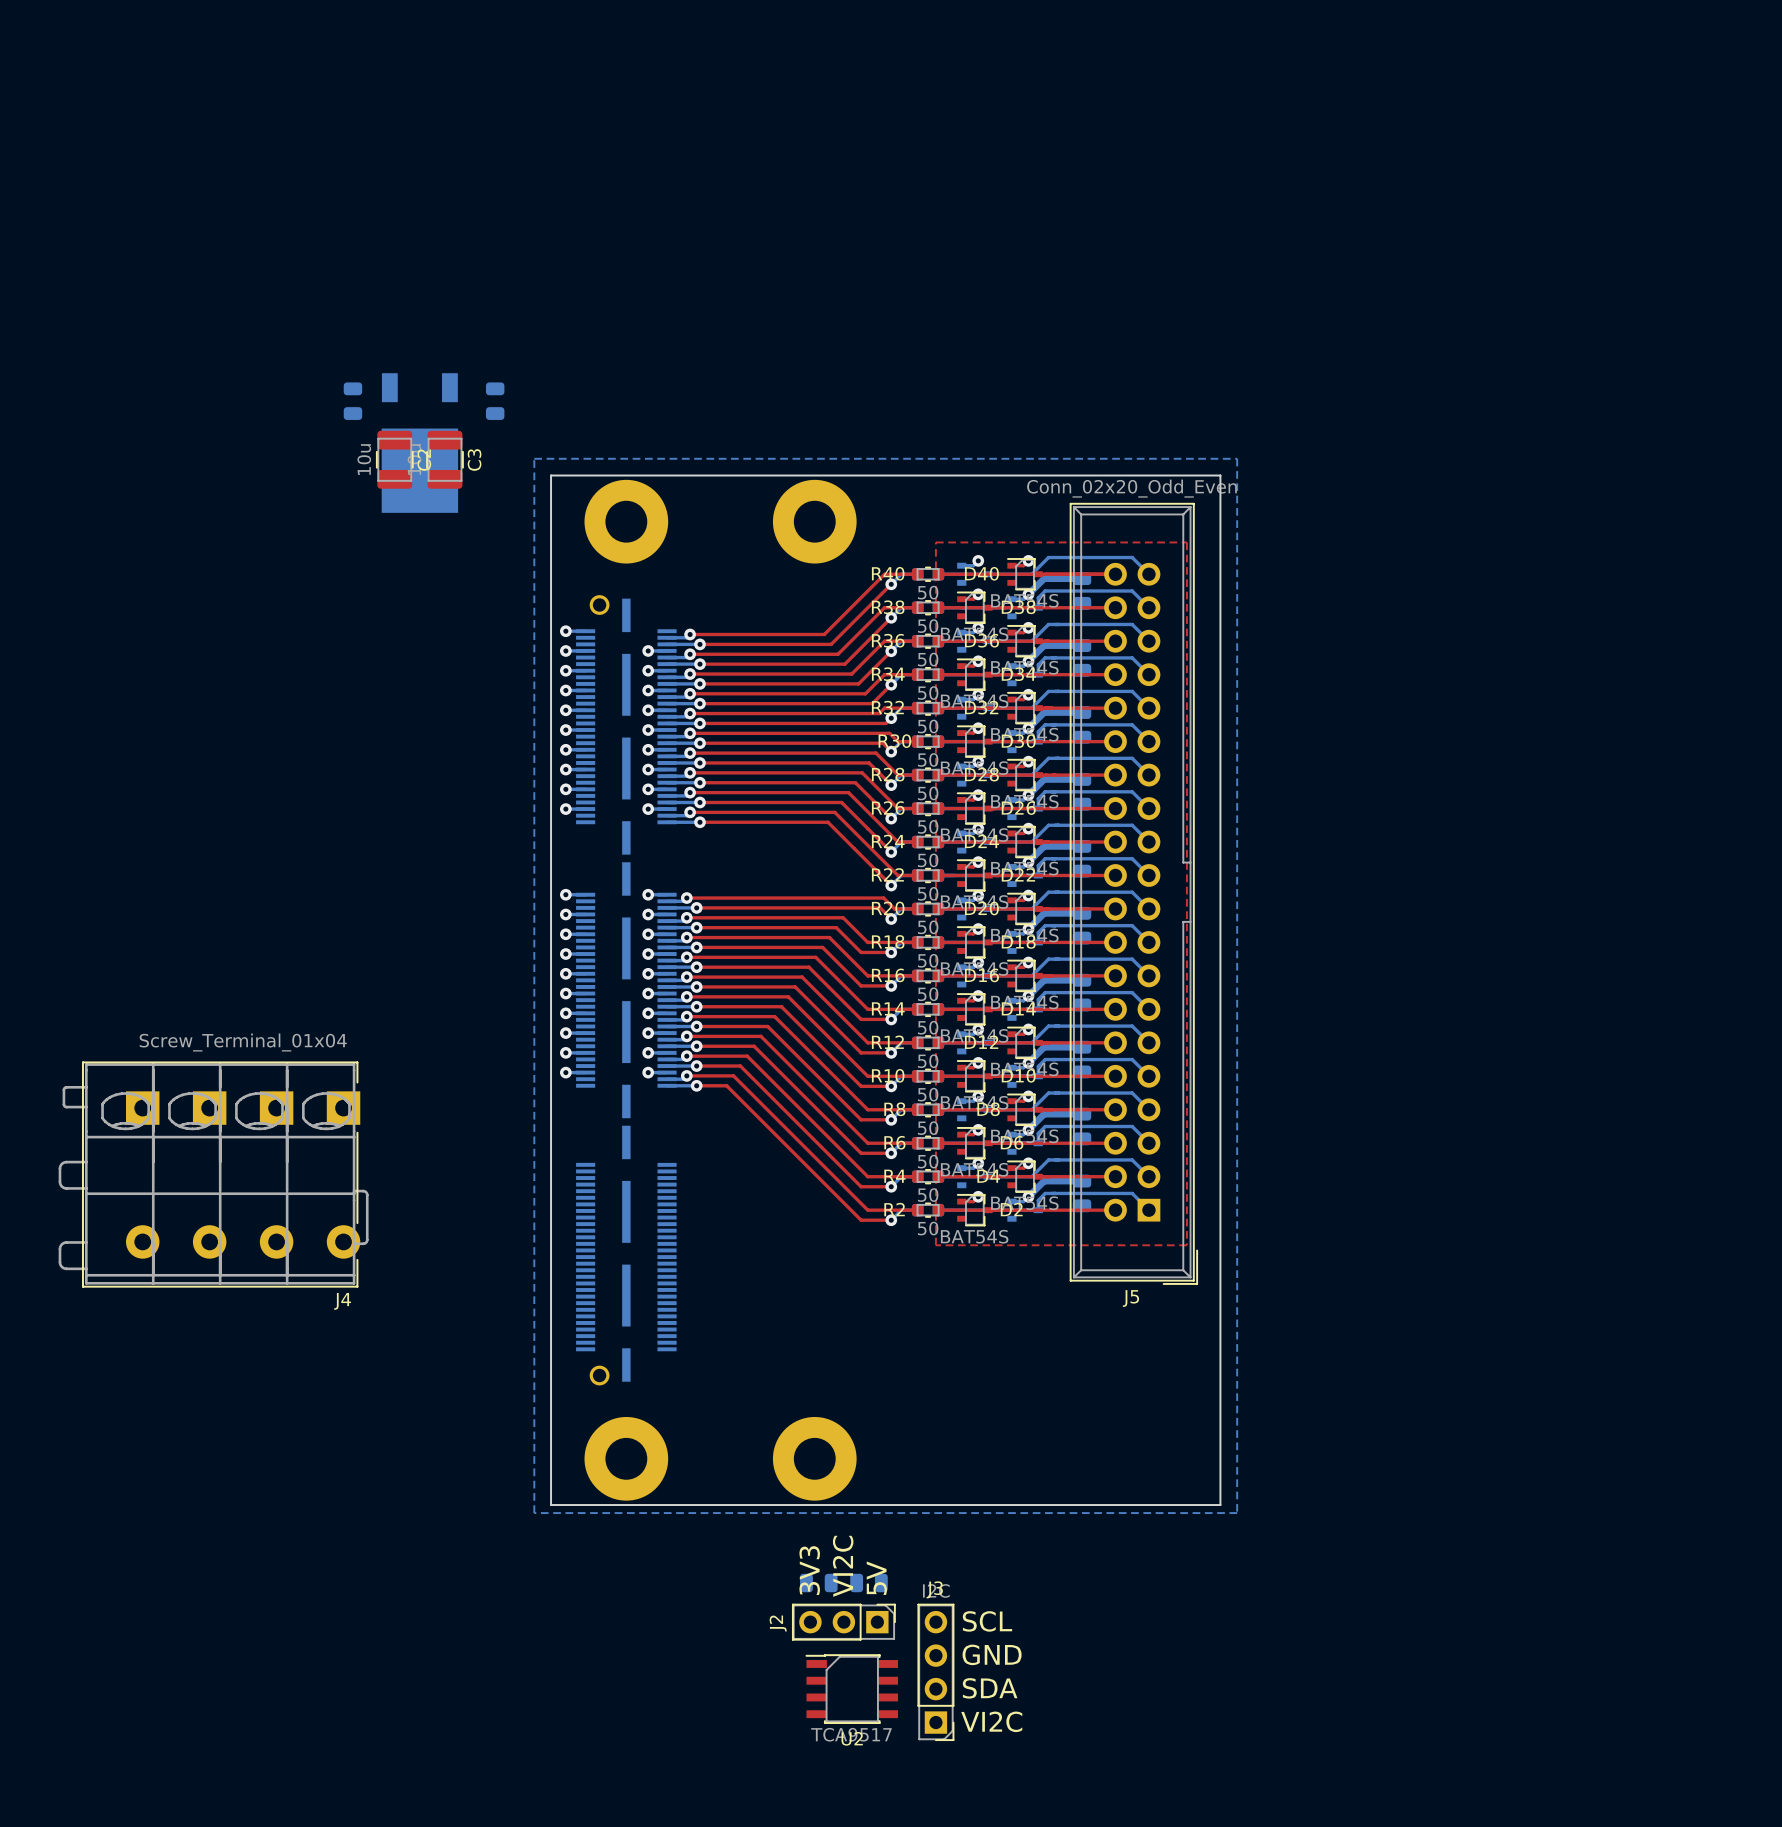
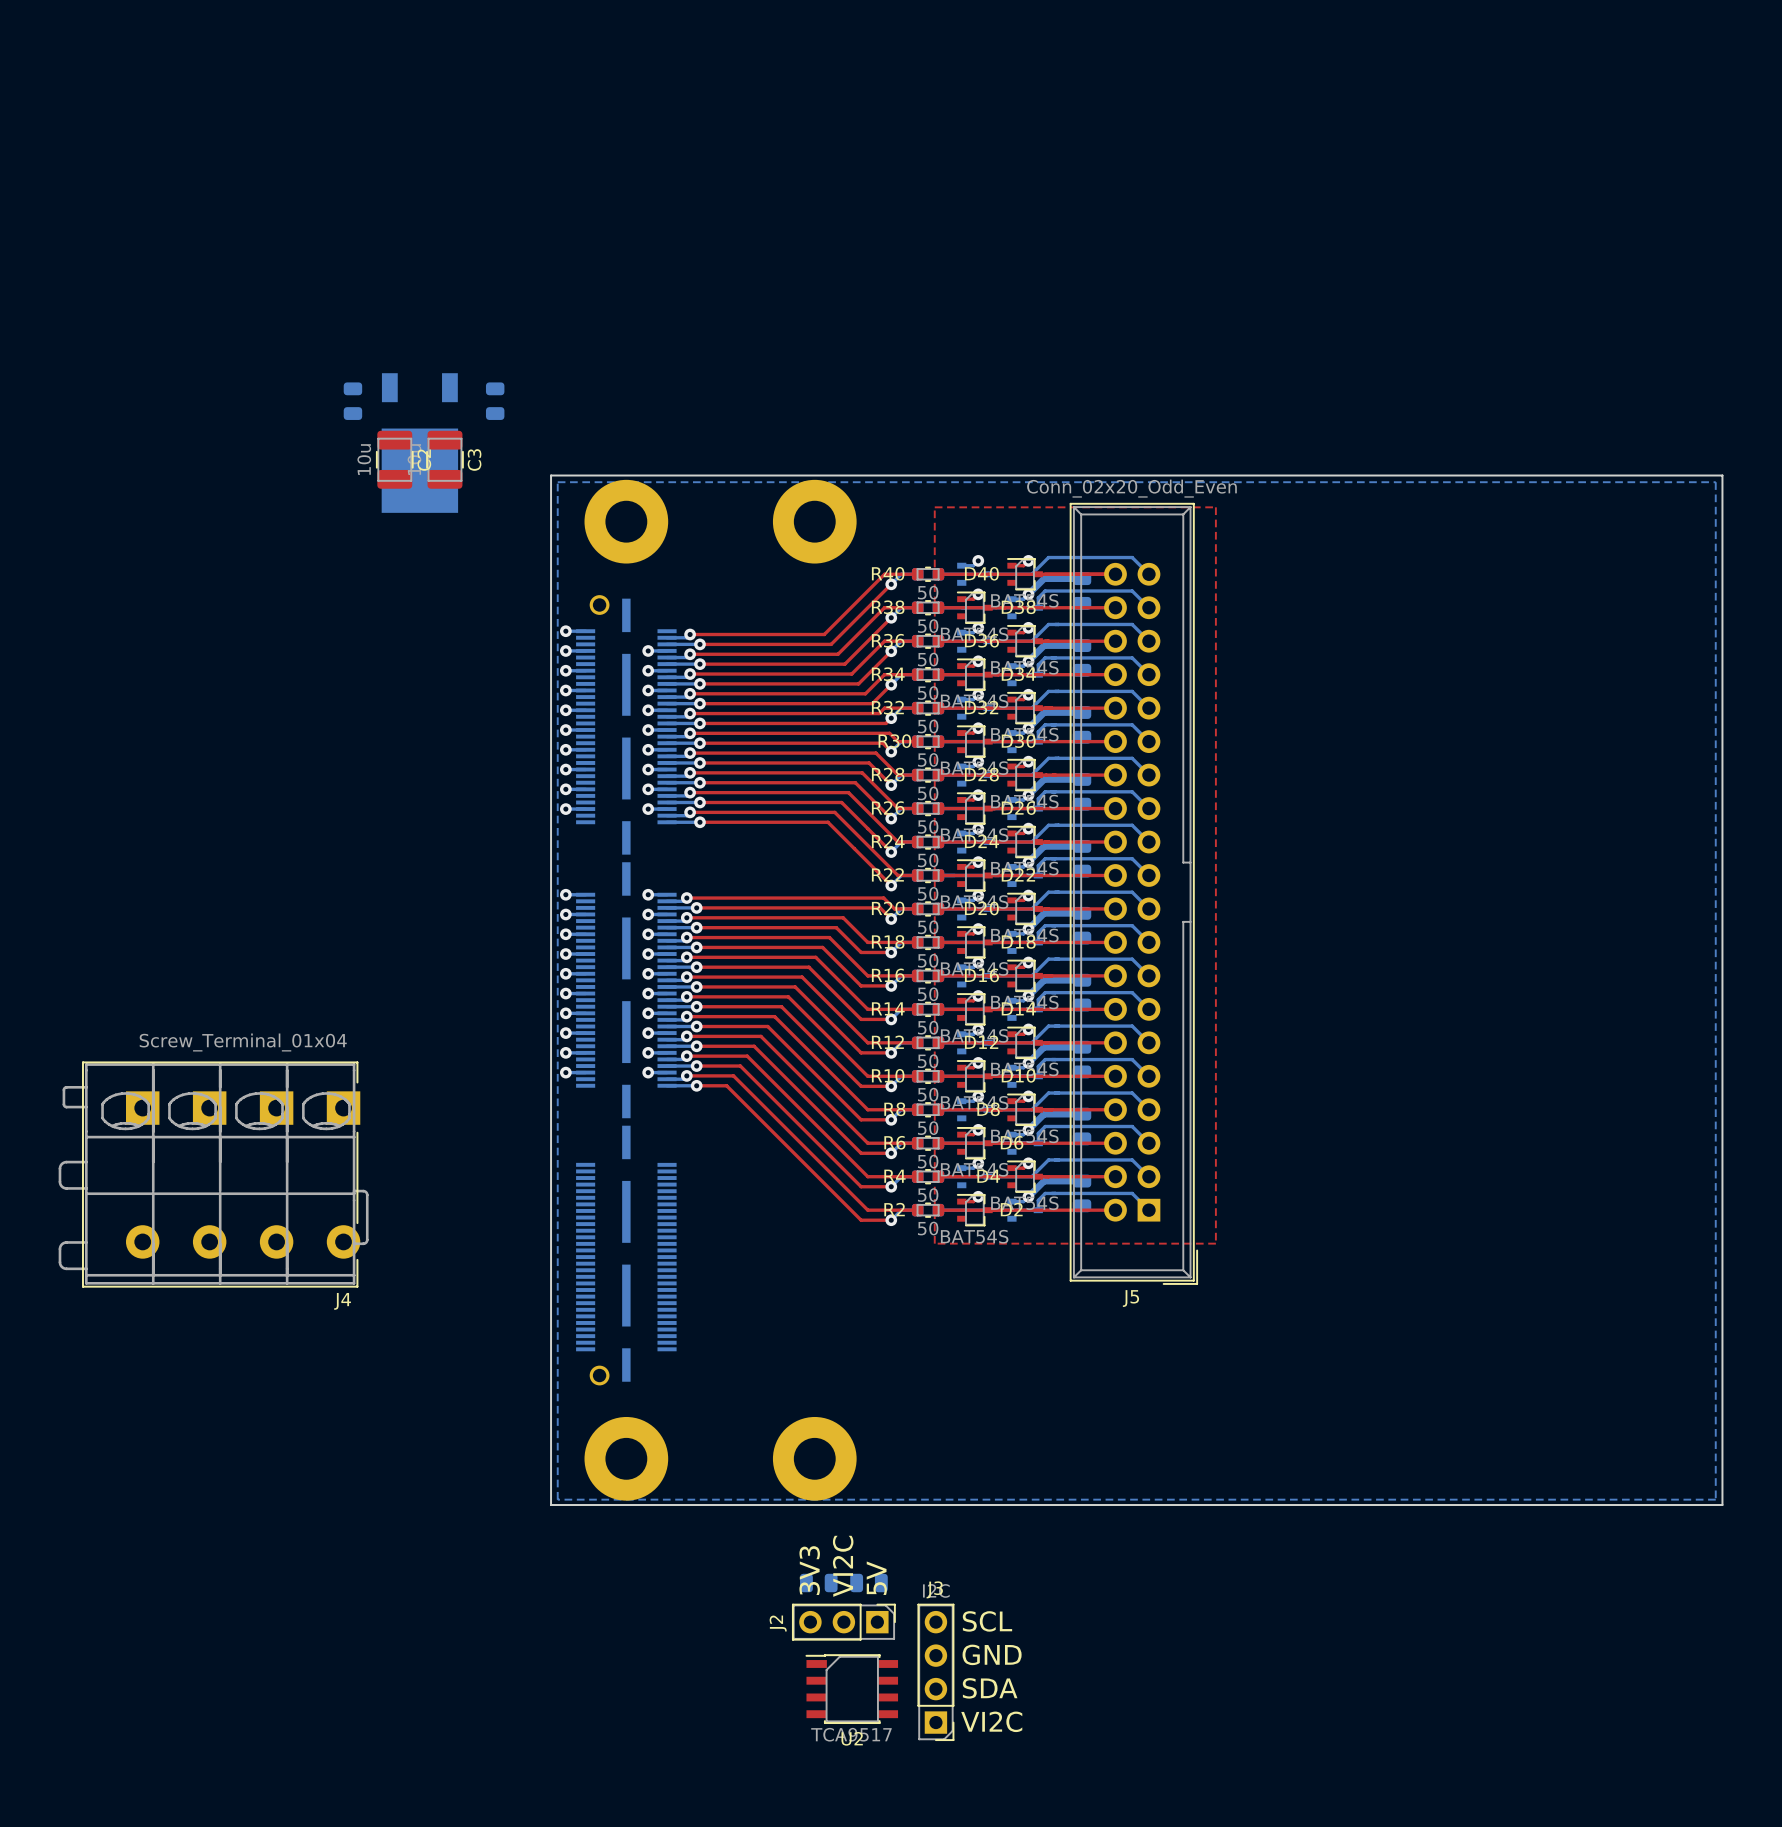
bottom zone outline: (534, 458) (534, 1513) (1237, 1513) (1237, 458) (534, 458) -> (557, 482) (557, 1499) (1715, 1499) (1715, 482) (557, 482)
board edge: (1220, 475) (1220, 1505) -> (1220, 475) (1722, 475) (1722, 1505) (1220, 1505)
top zone outline: (935, 542) (935, 1245) (1186, 1245) (1186, 542) (935, 542) -> (934, 507) (934, 1243) (1215, 1243) (1215, 507) (934, 507)

